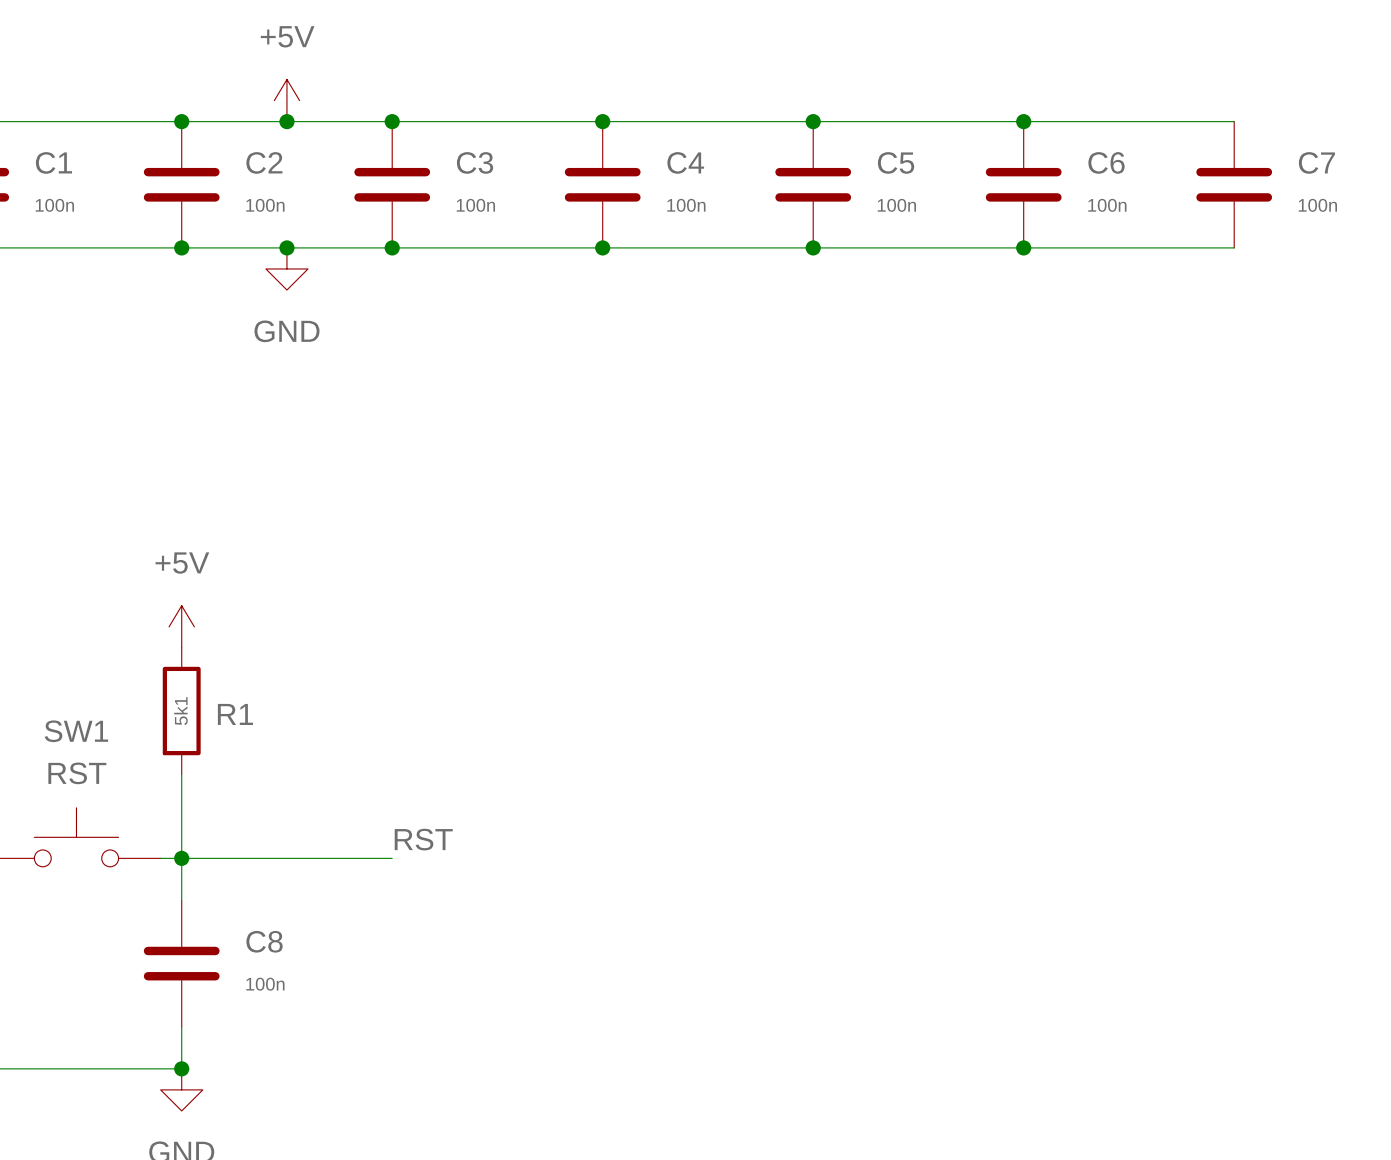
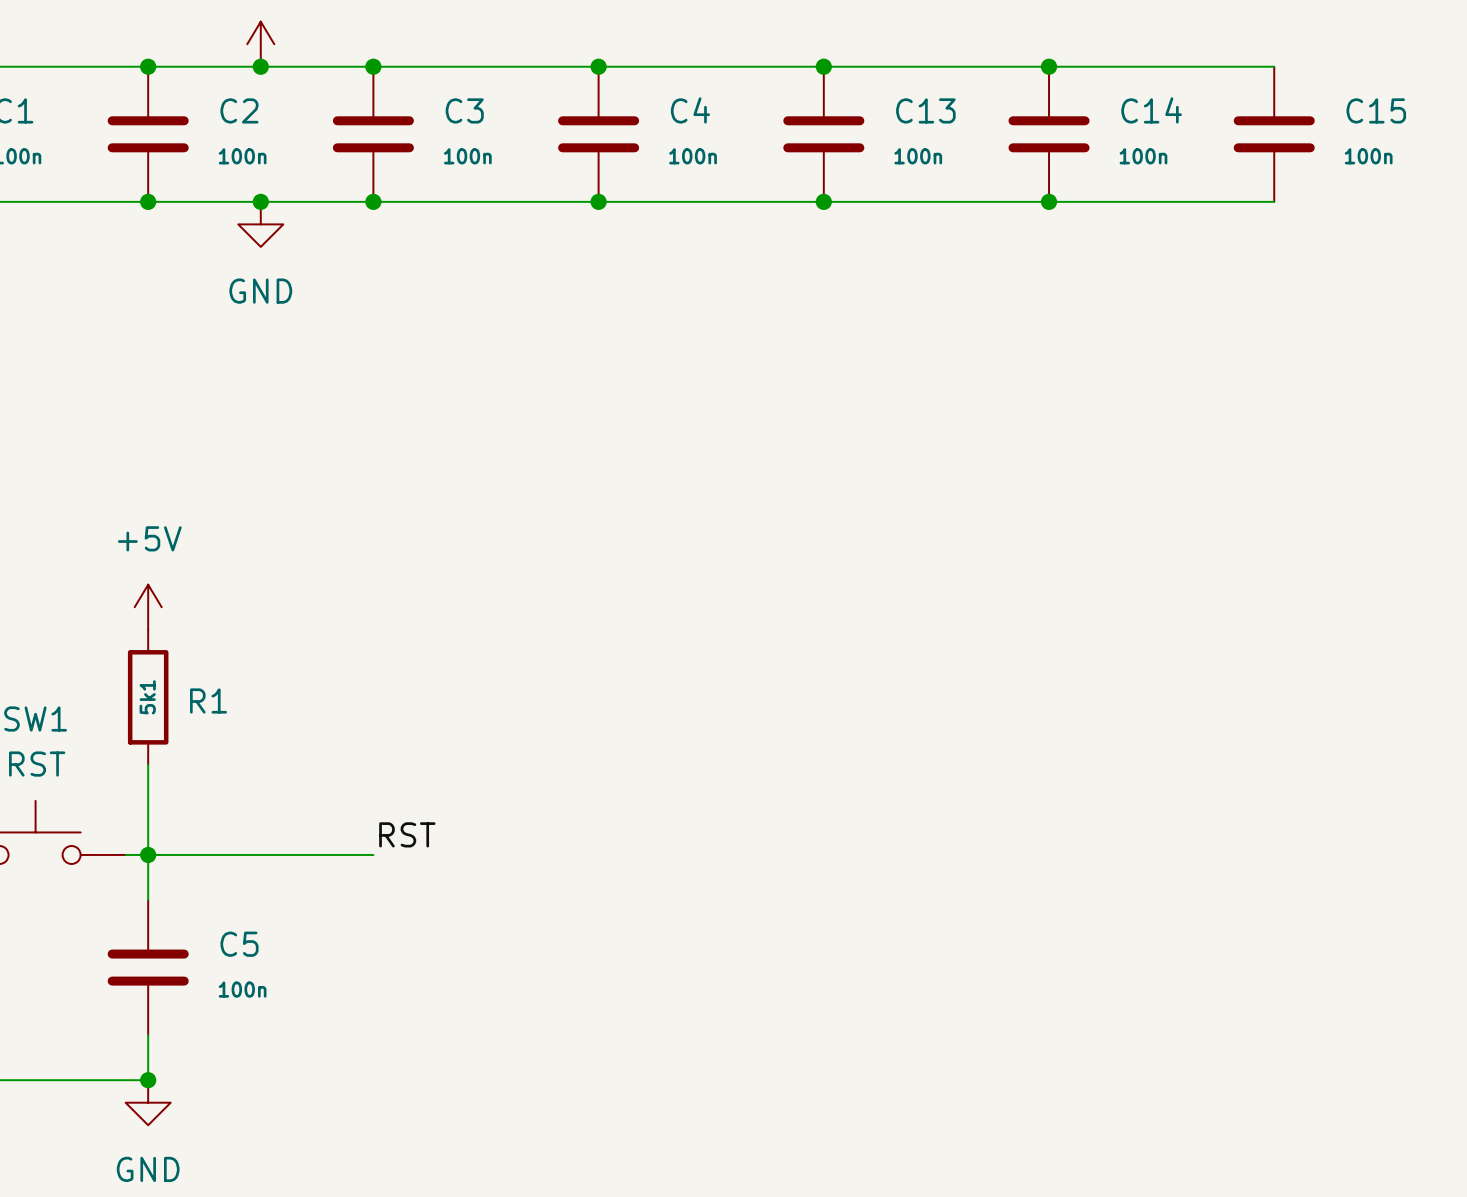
C5 name: C5 (896, 162) -> C13 (925, 110)
C6 name: C6 (1106, 162) -> C14 (1151, 110)
C7 name: C7 (1316, 162) -> C15 (1376, 110)
C8 name: C8 (264, 941) -> C5 (239, 944)

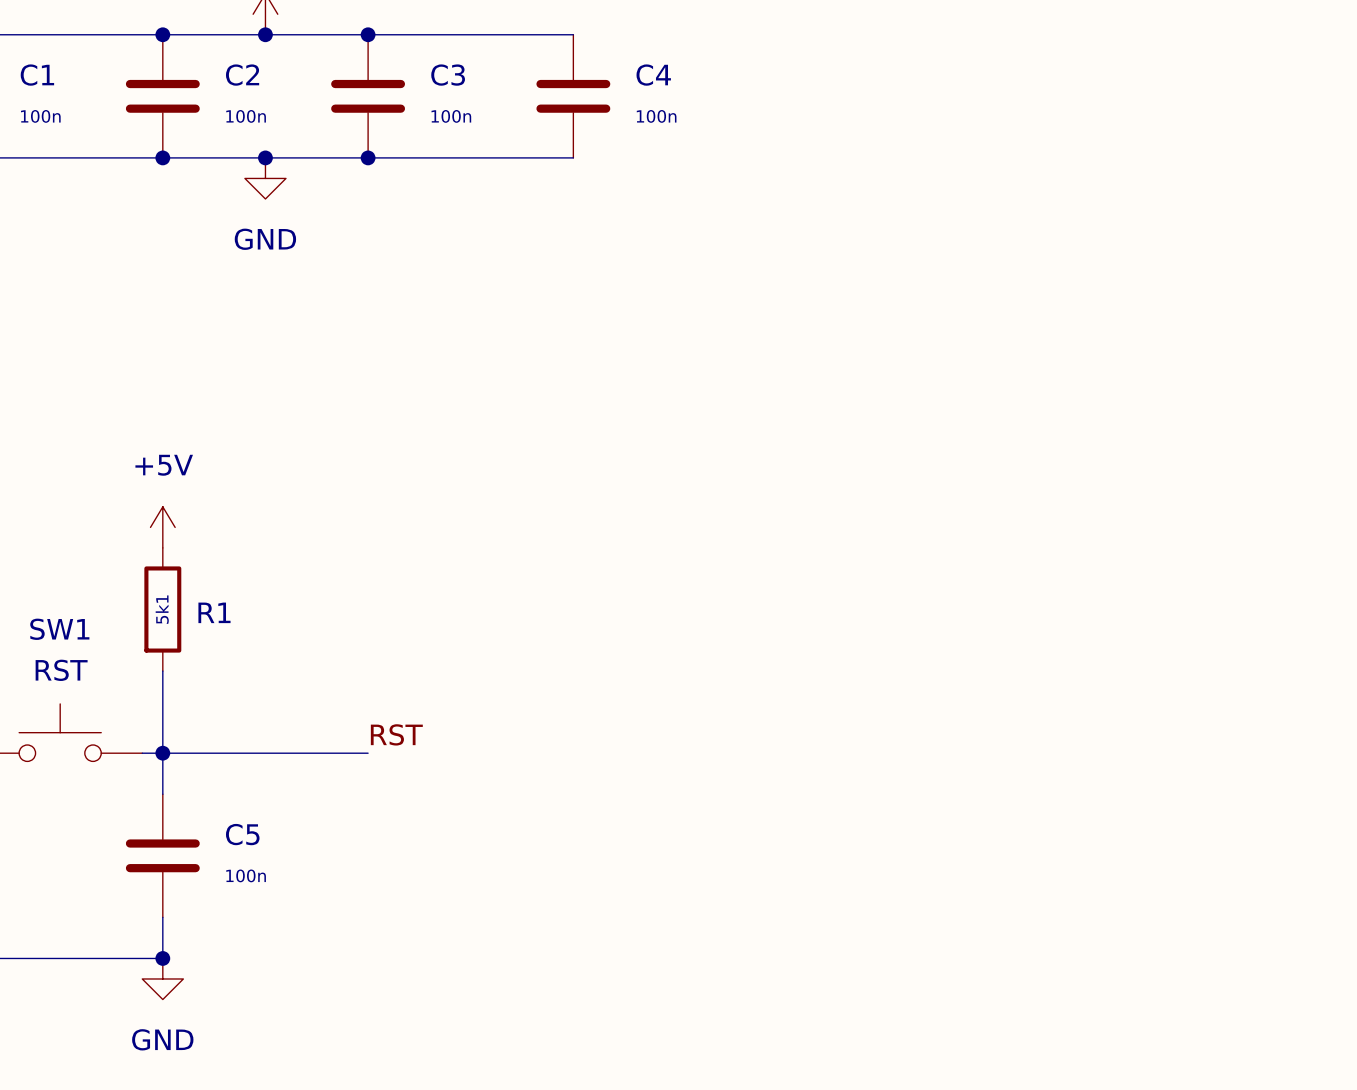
wire: (598, 66) (1274, 66) -> none
junction: (598, 66) -> none
junction: (823, 66) -> none
junction: (1049, 66) -> none
C13: 100n (823, 134) -> none
C14: 100n (1049, 134) -> none
C15: 100n (1274, 134) -> none
wire: (598, 201) (1274, 201) -> none
junction: (598, 201) -> none
junction: (823, 201) -> none
junction: (1049, 201) -> none

